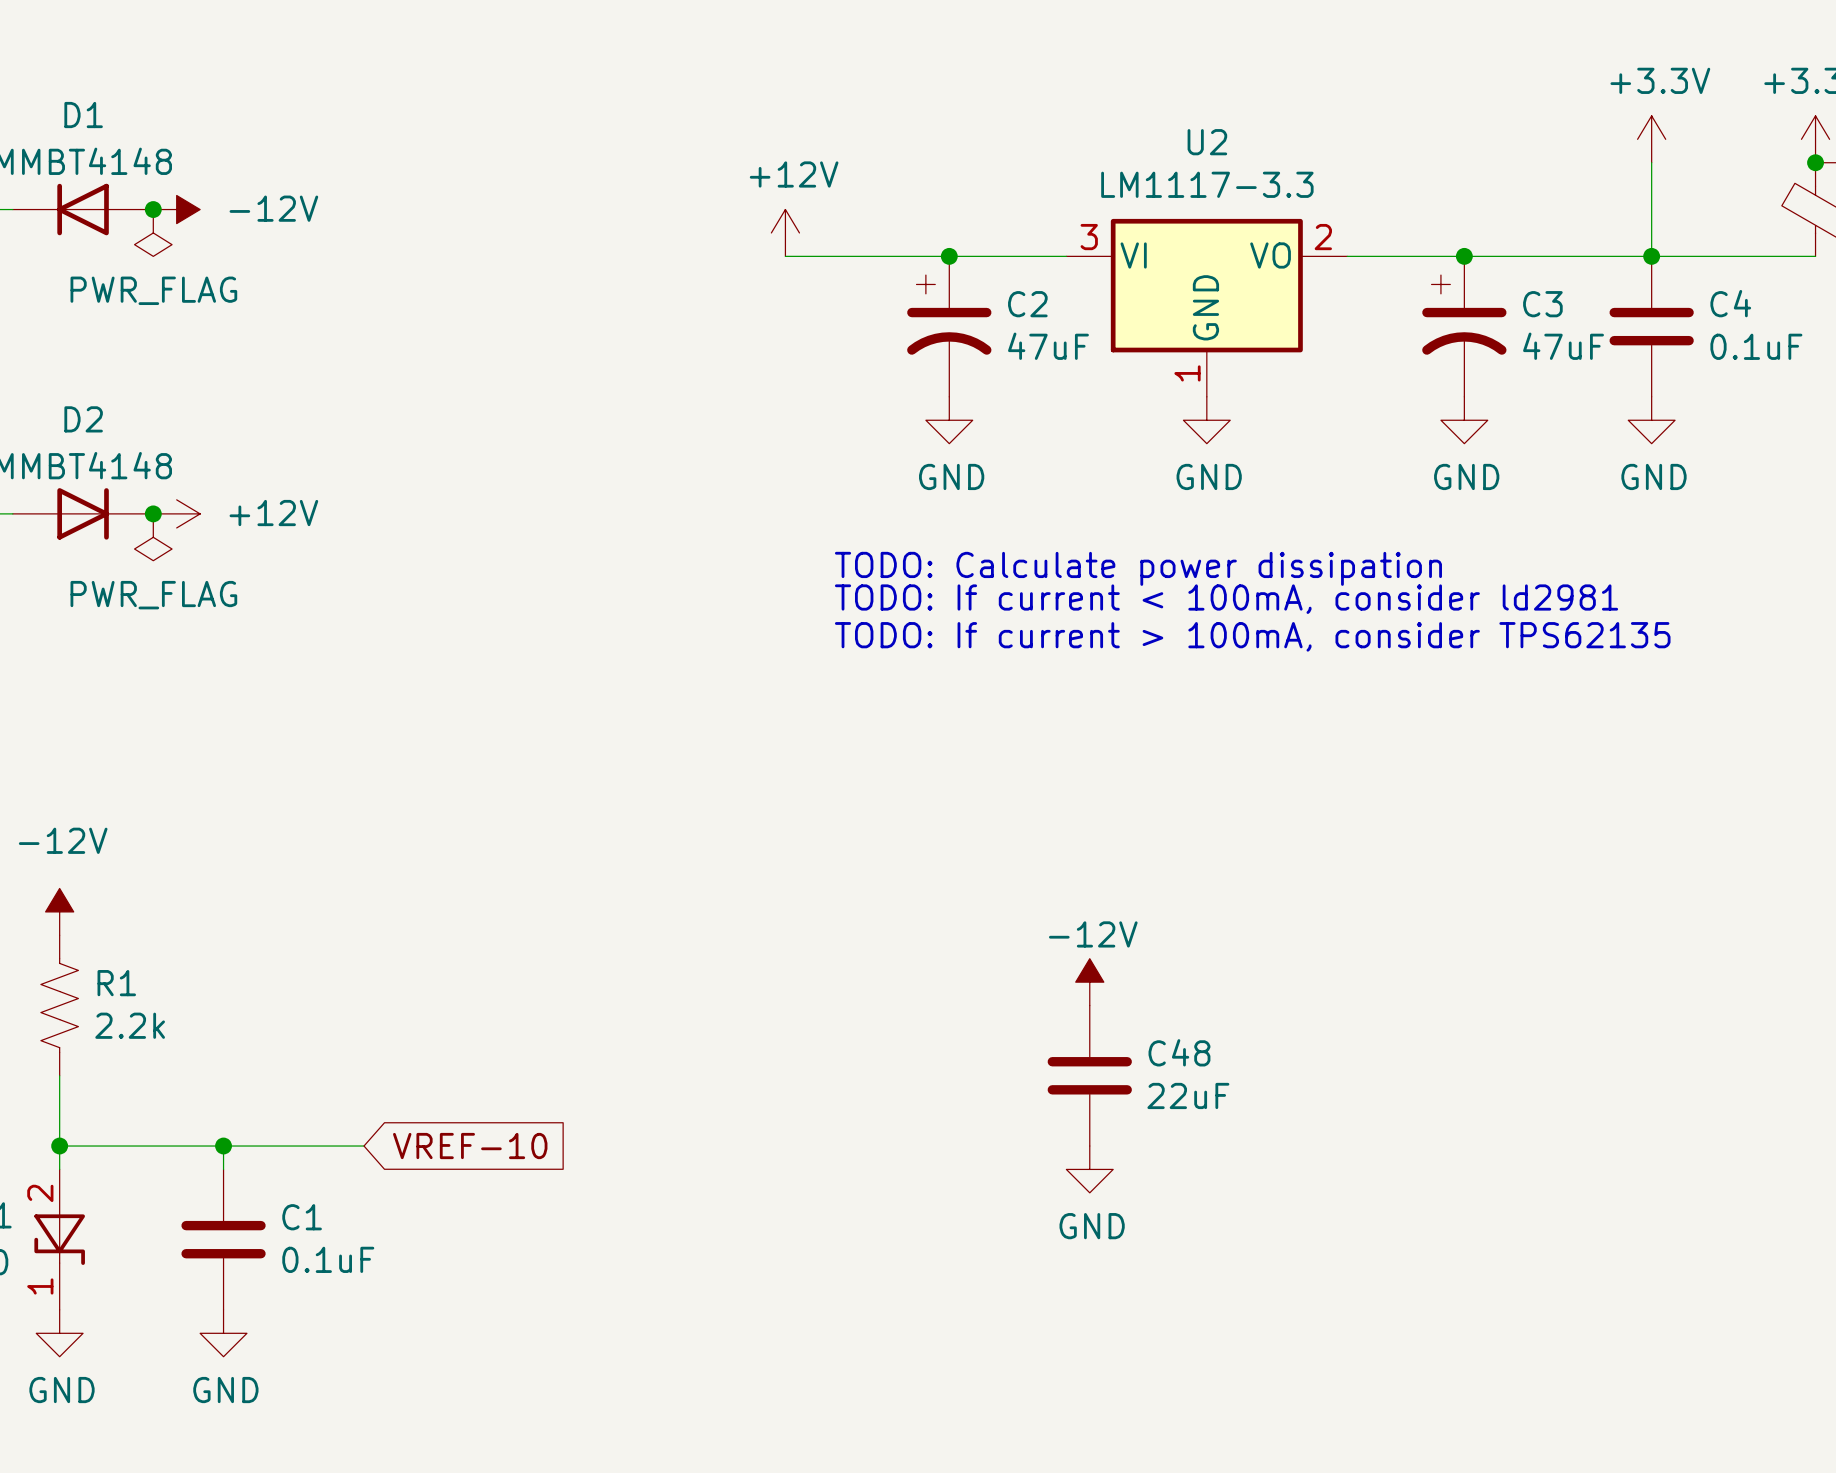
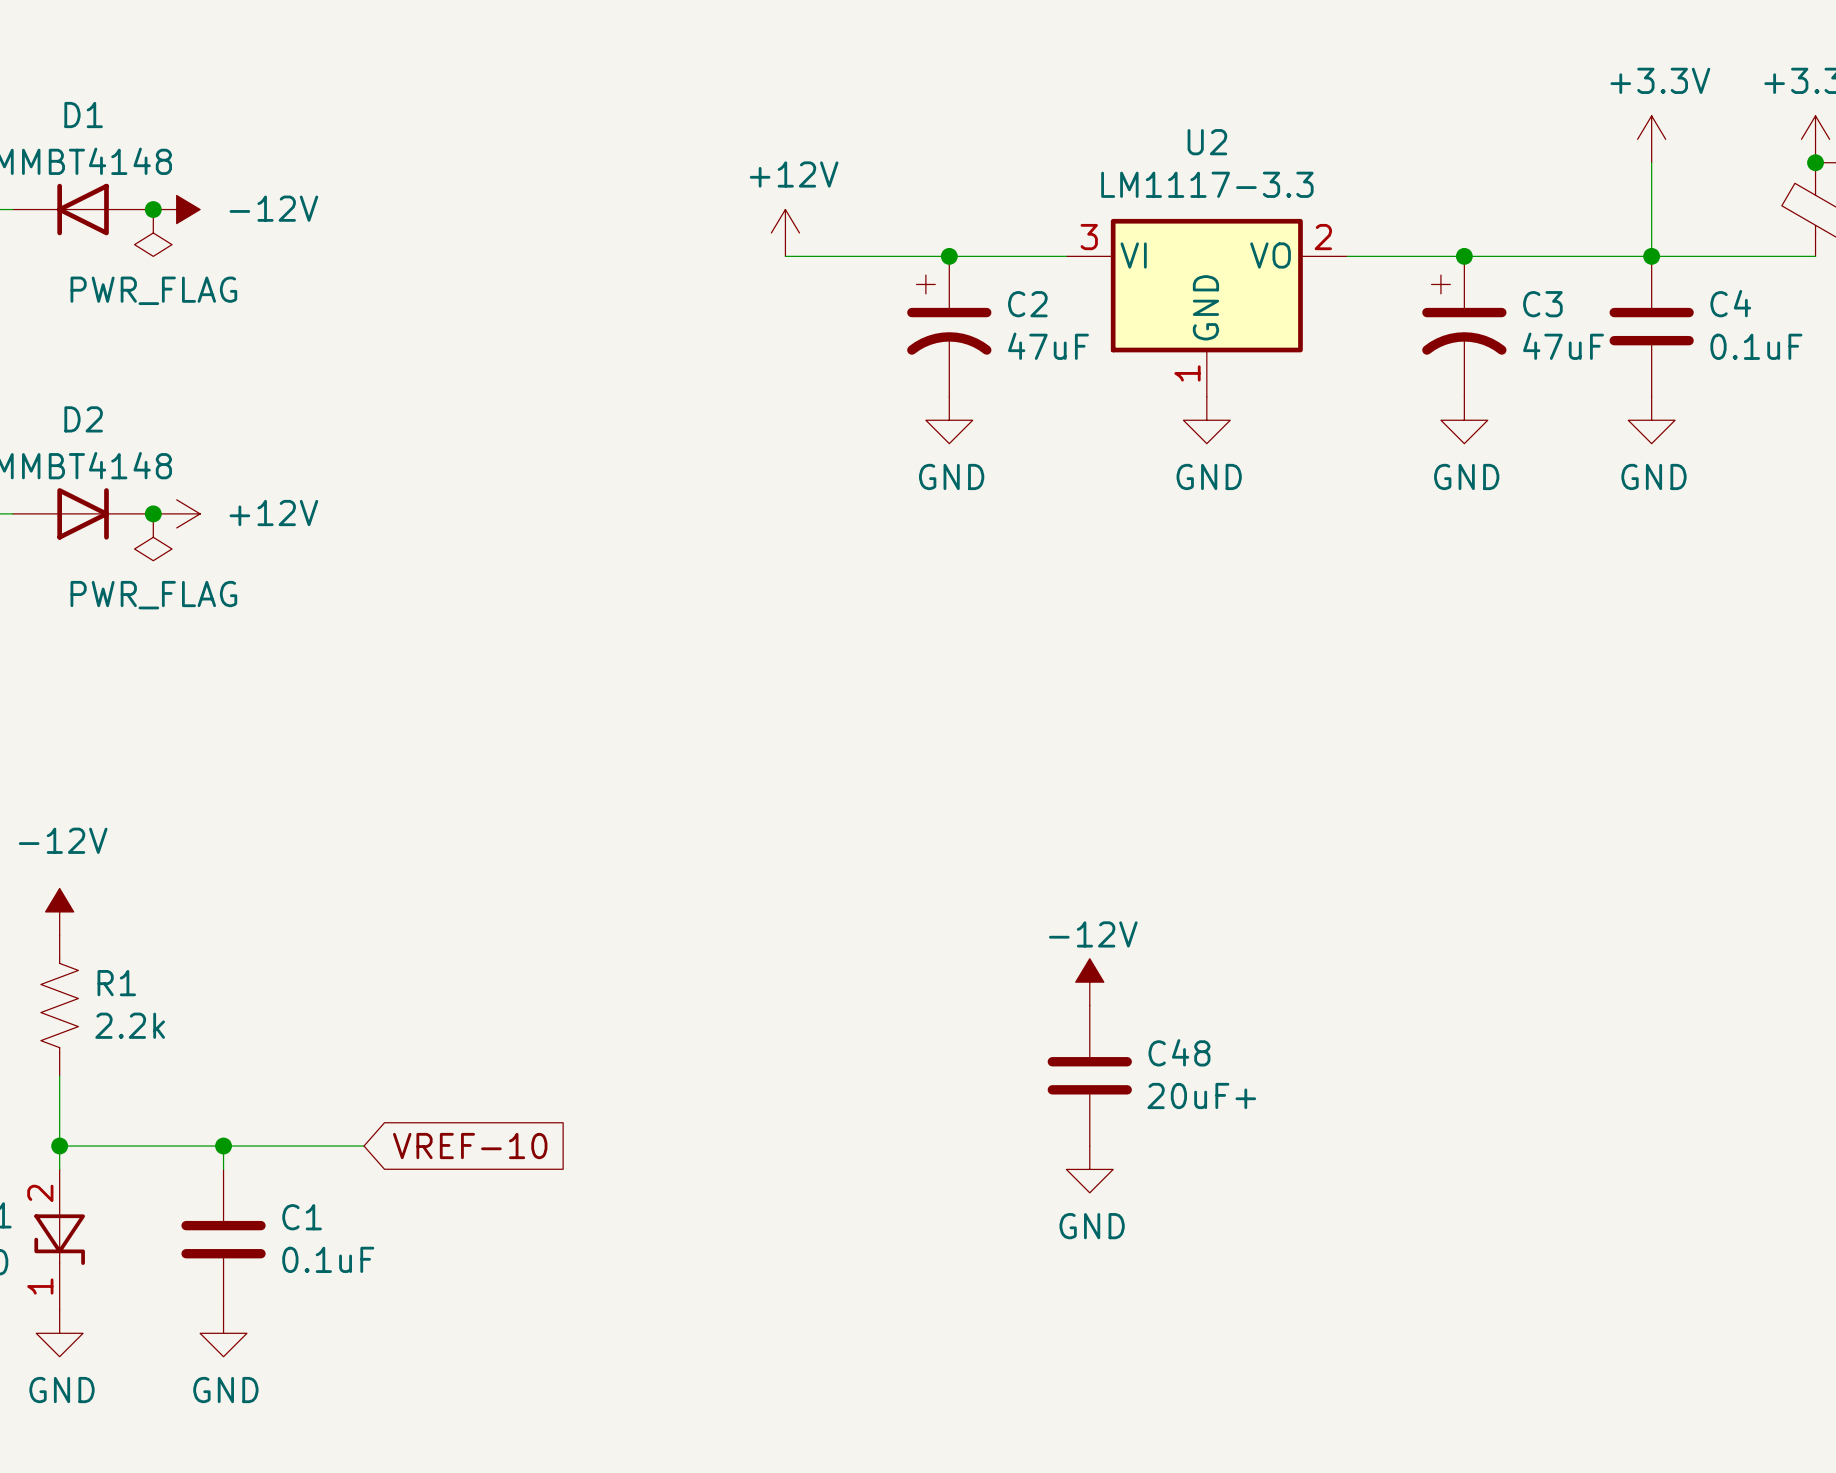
text: TODO: Calculate power dissipation (1138, 568) -> none
text: TODO: If current < 100mA, consider ld2981 (1226, 599) -> none
text: TODO: If current > 100mA, consider TPS62135 (1252, 636) -> none
C48 value: 22uF (1188, 1095) -> 20uF+ (1201, 1095)

